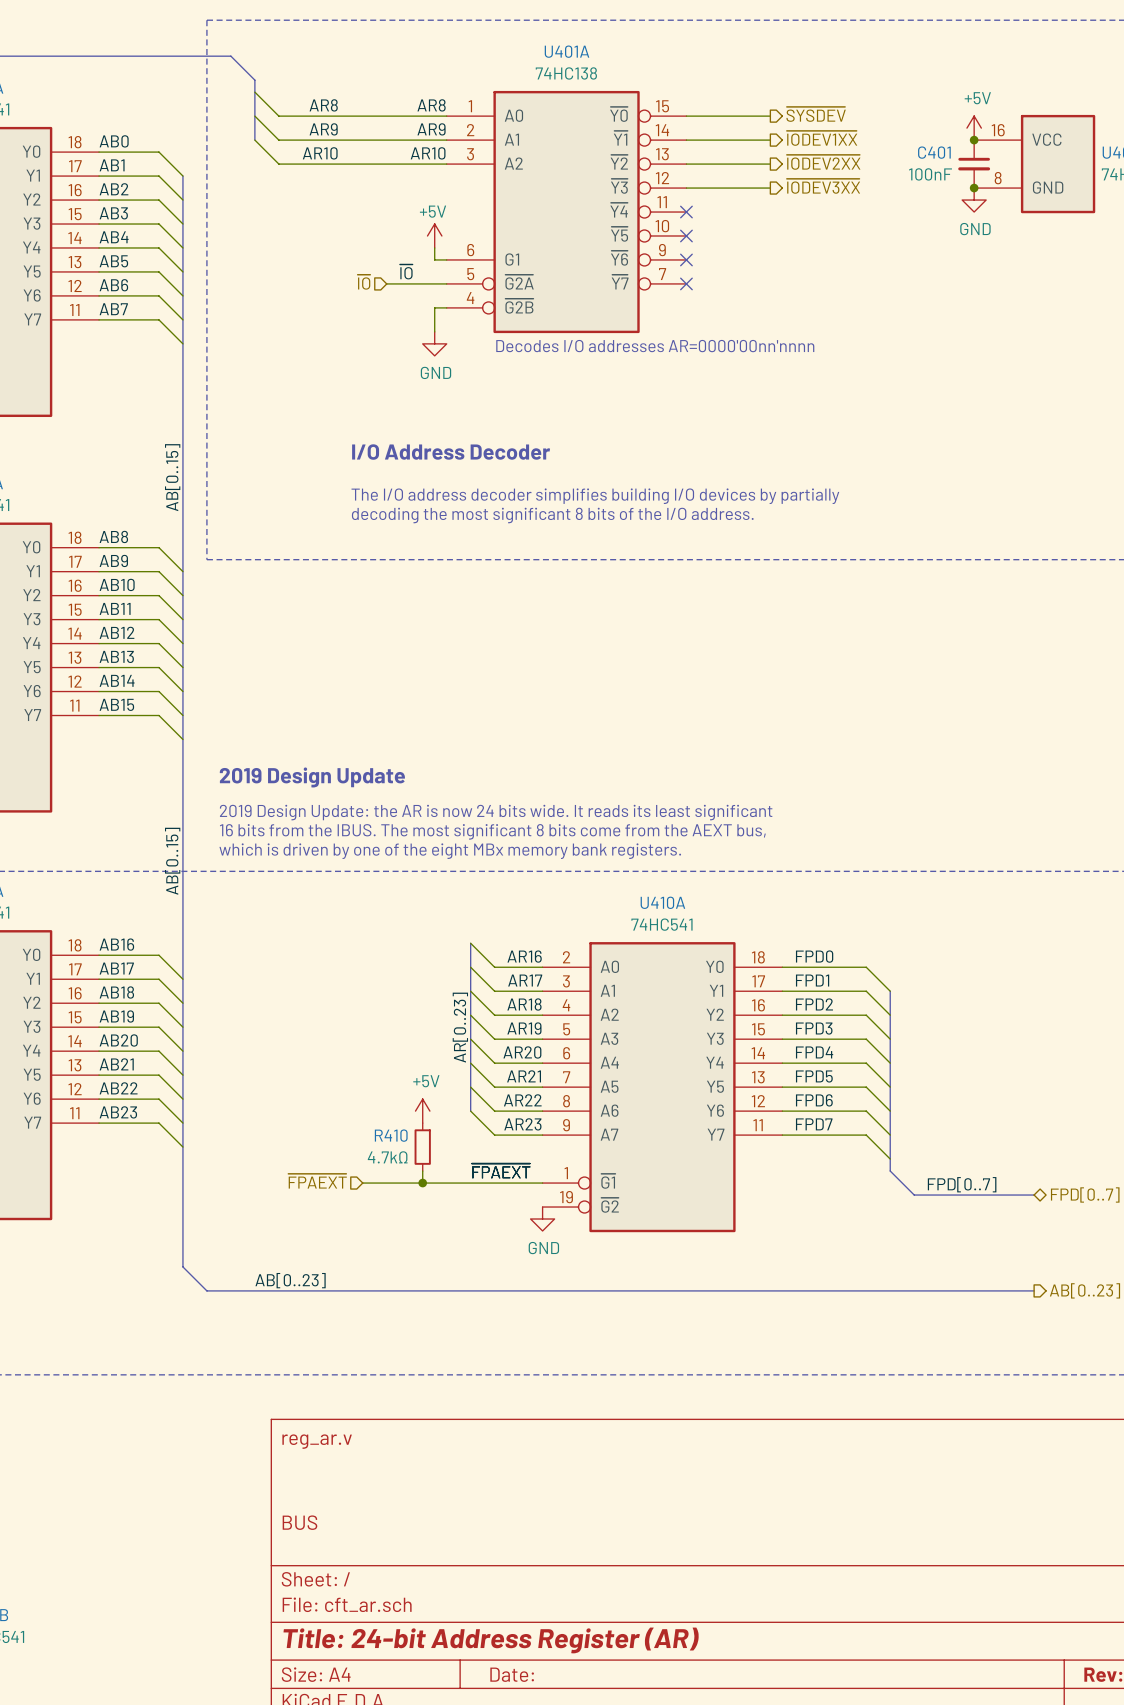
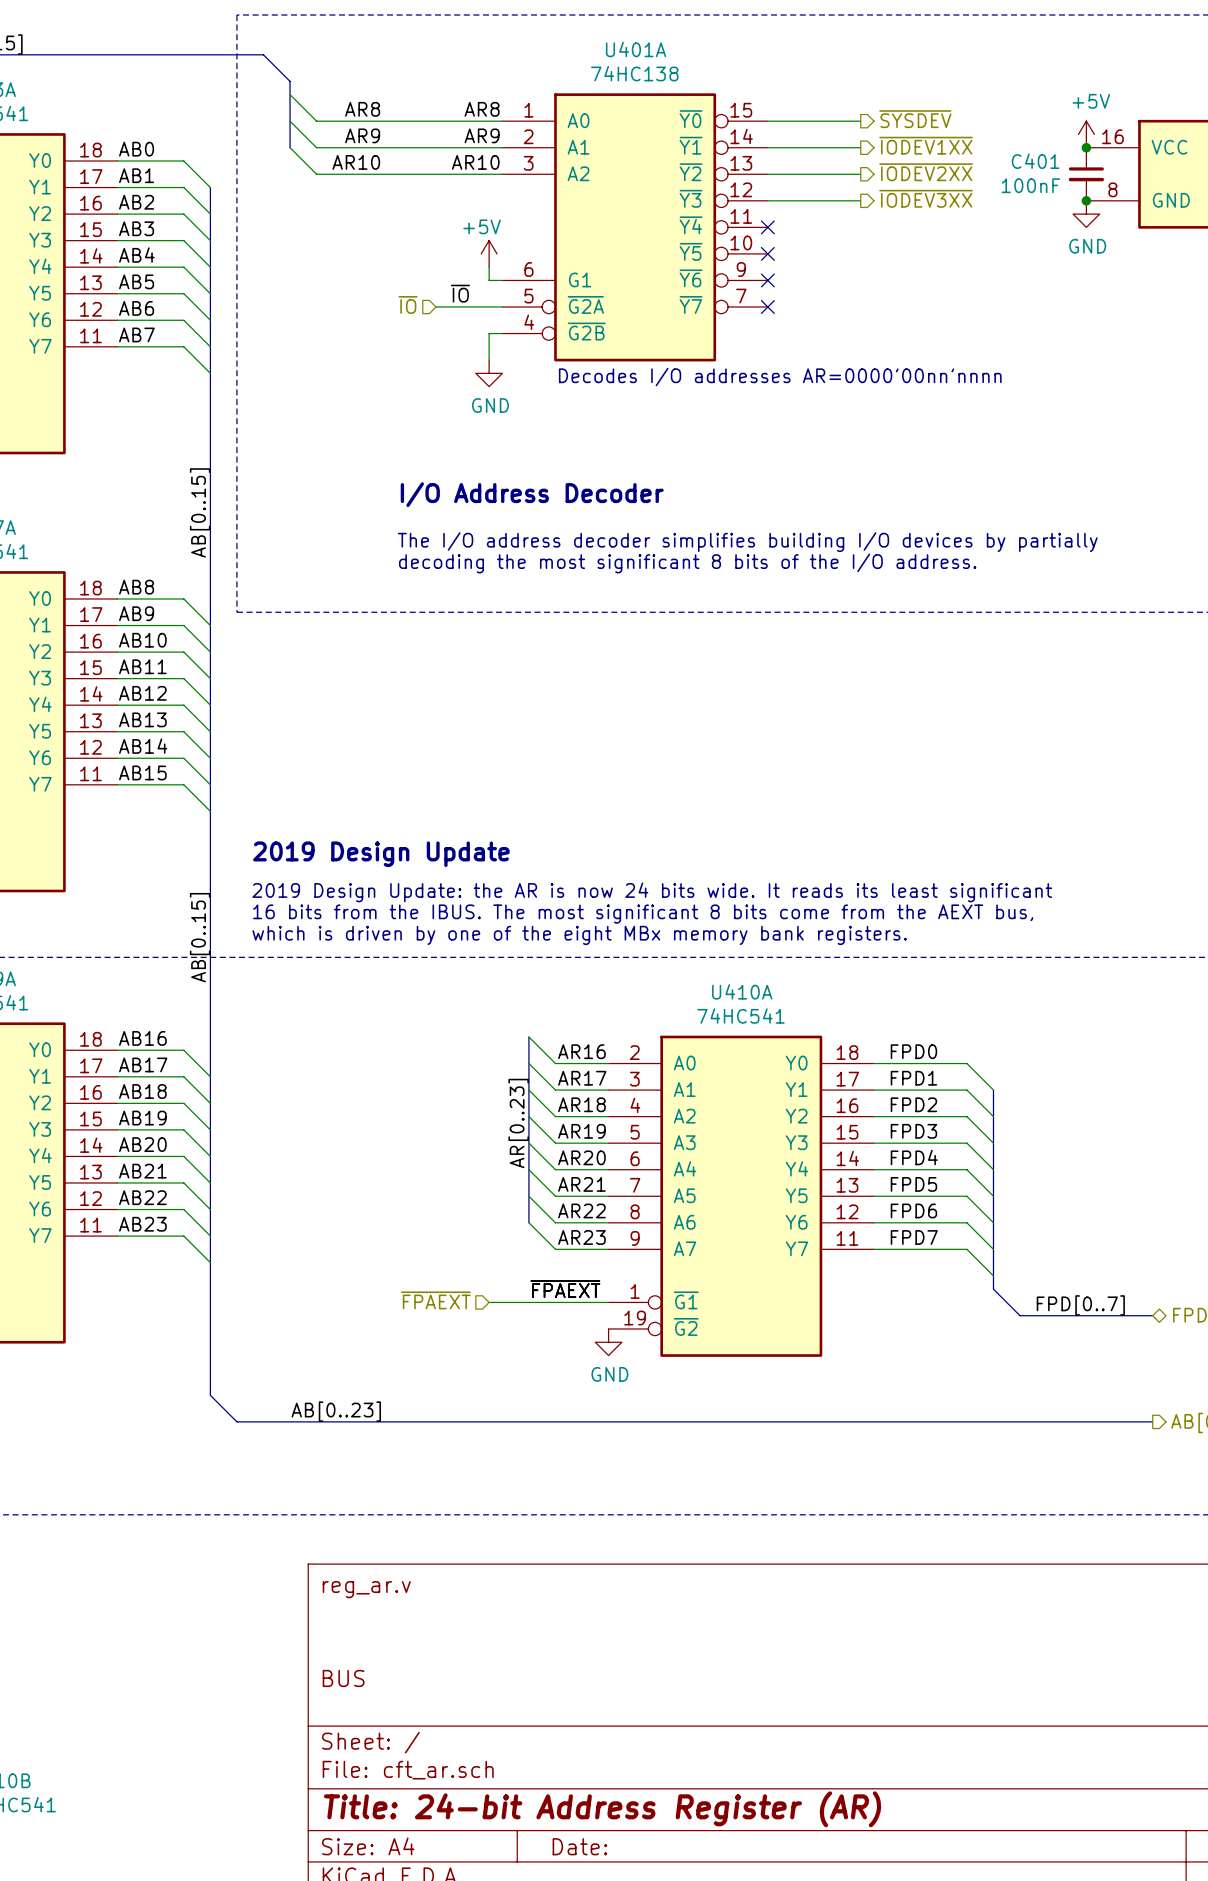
power symbol: +5V (422, 1111) -> none
R410: 4.7kΩ (422, 1147) -> none
hierarchical label position: ~{FPAEXT} (317, 1181) -> ~{FPAEXT} (435, 1300)
wire: (362, 1183) (434, 1183) -> none
junction: (422, 1183) -> none

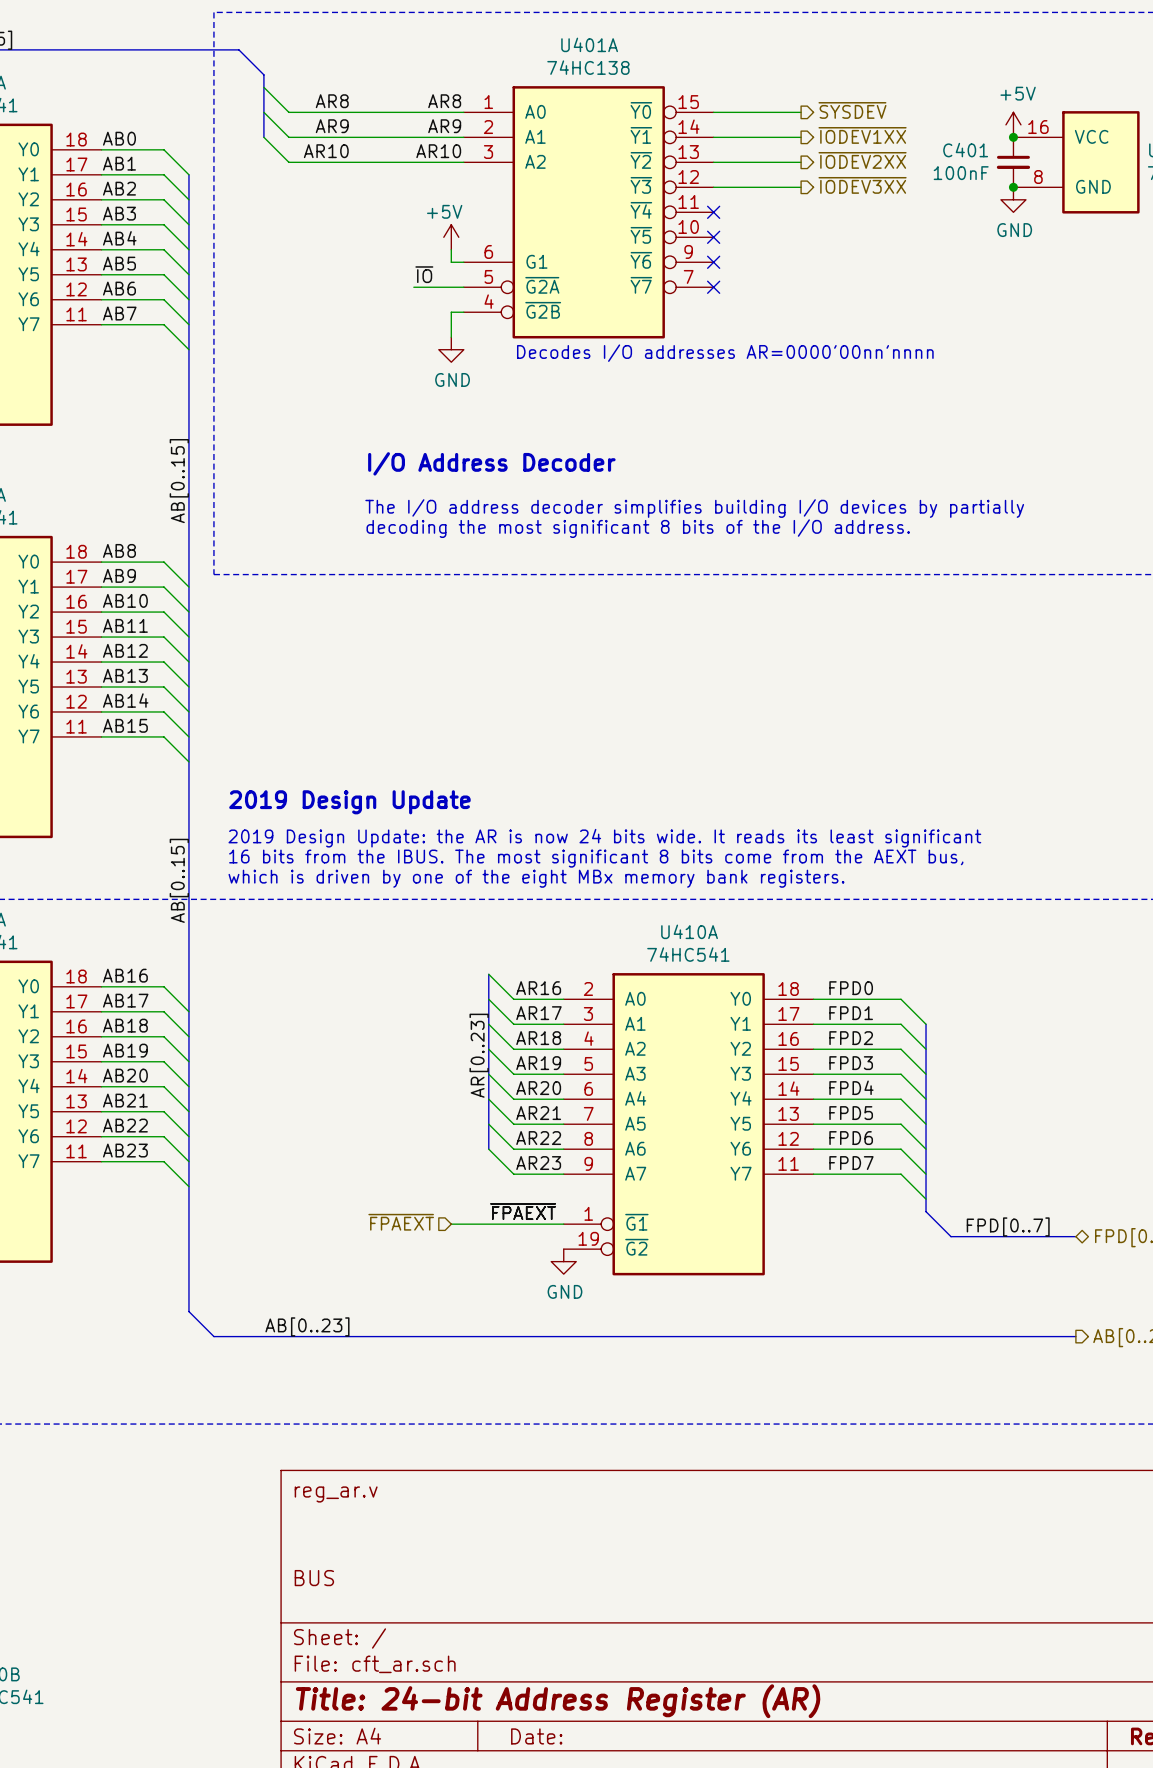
hierarchical label: ~{IO} (408, 304) -> none
wire: (436, 307) (449, 307) -> none

